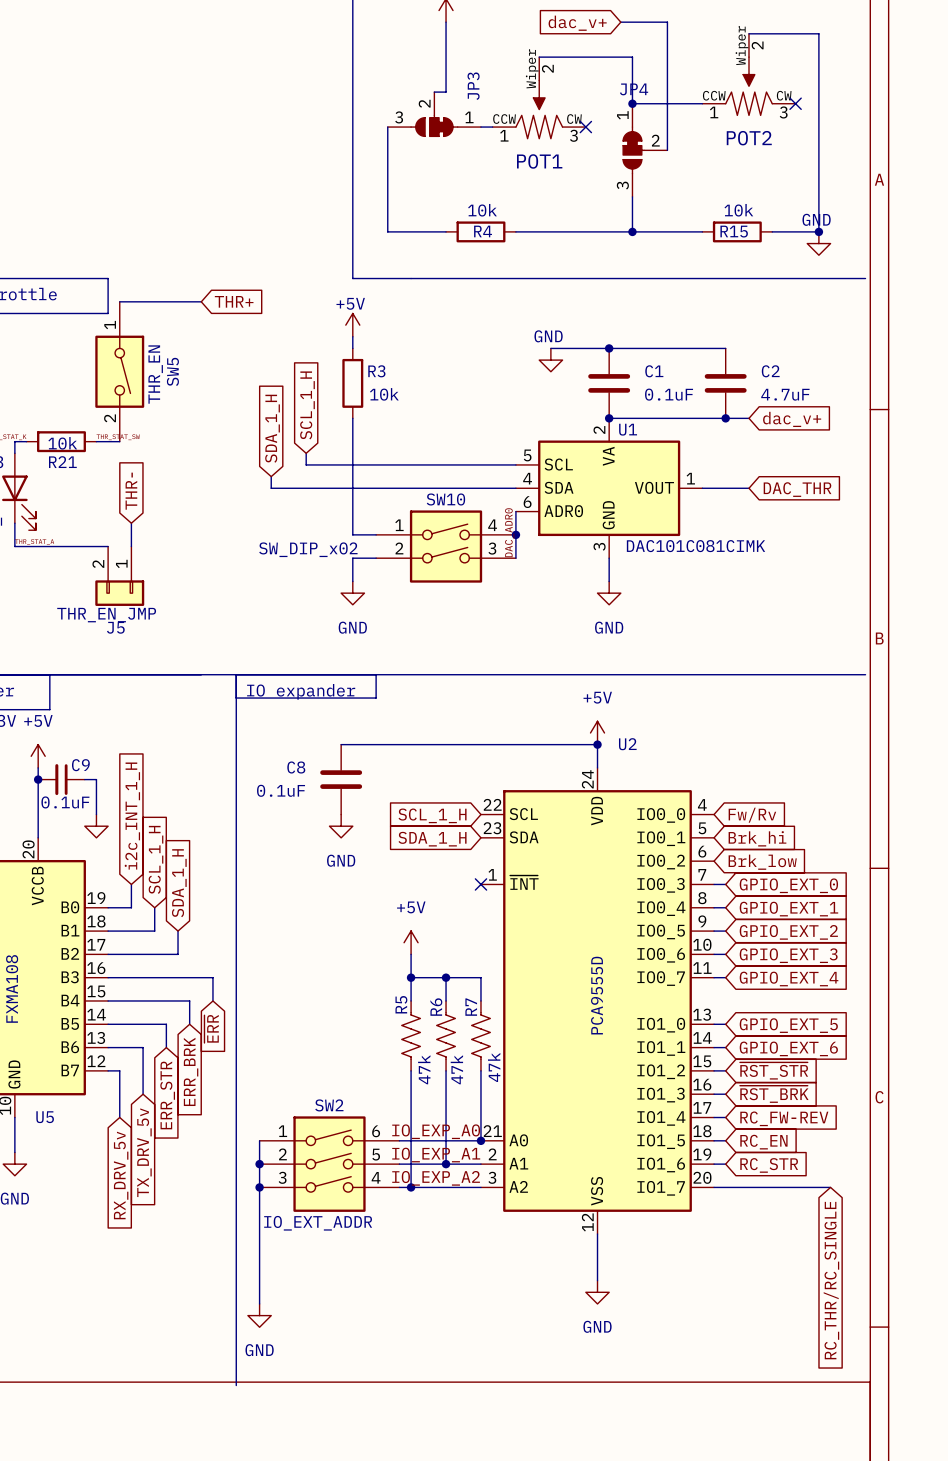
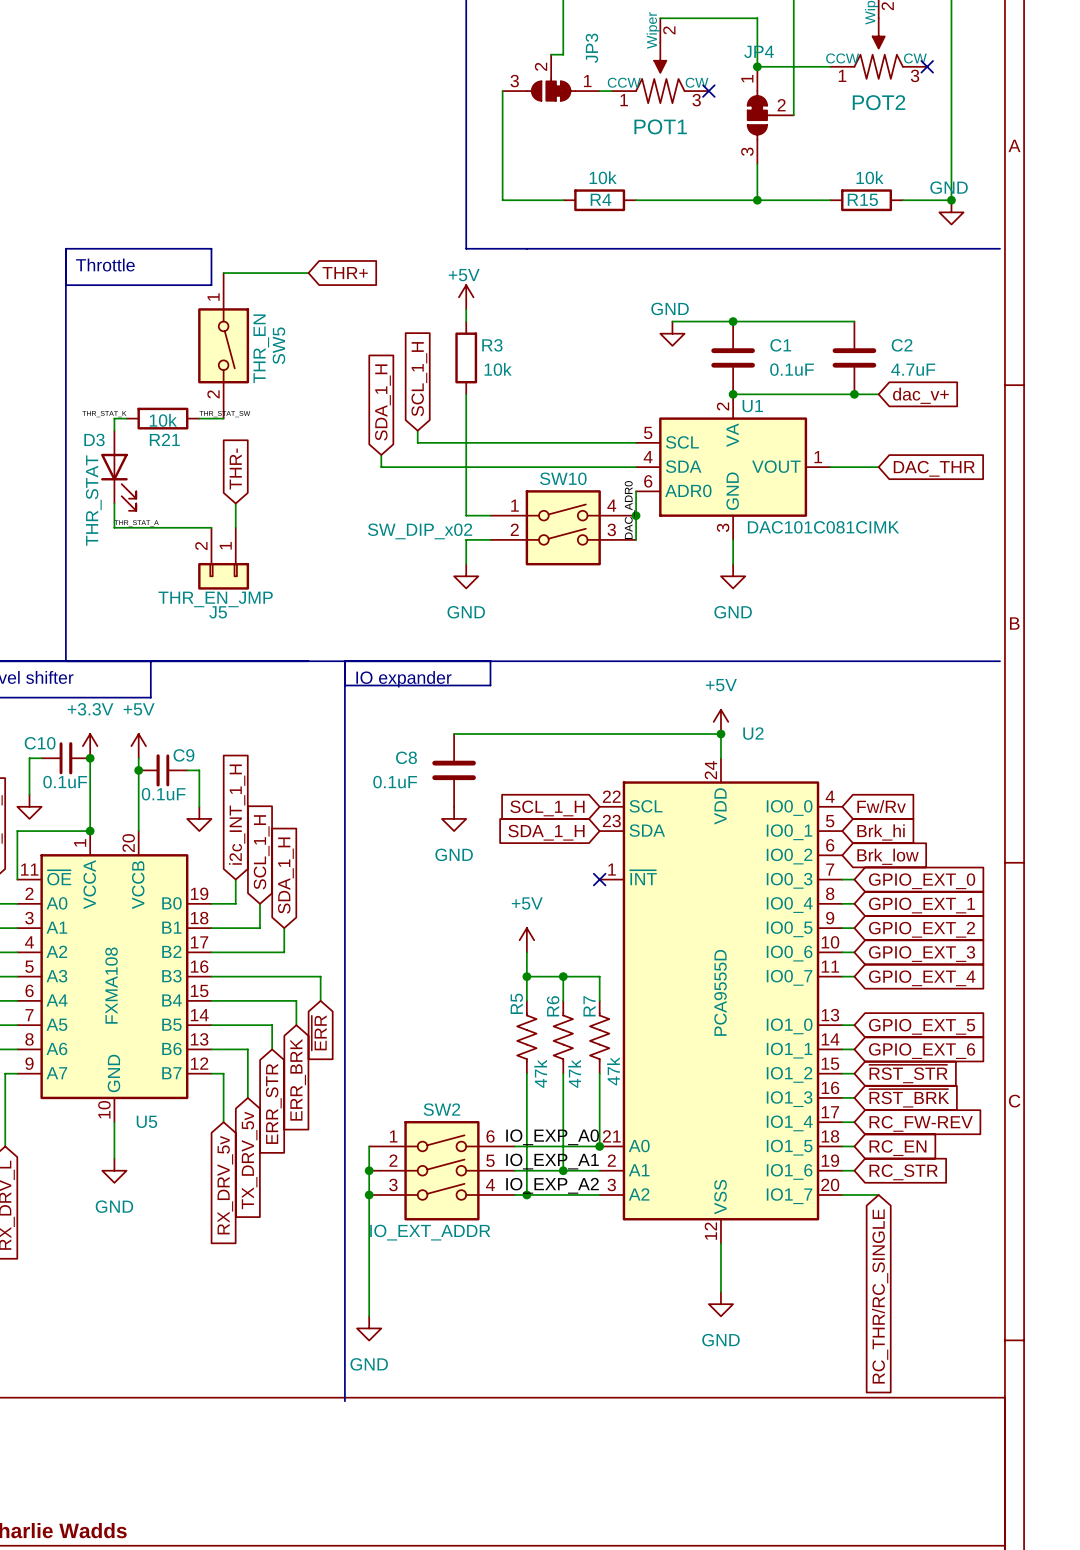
wire: (748, 1187) (830, 1187) -> none
global label position: RC_THR/RC_SINGLE (831, 1280) -> RC_THR/RC_SINGLE (880, 1296)

